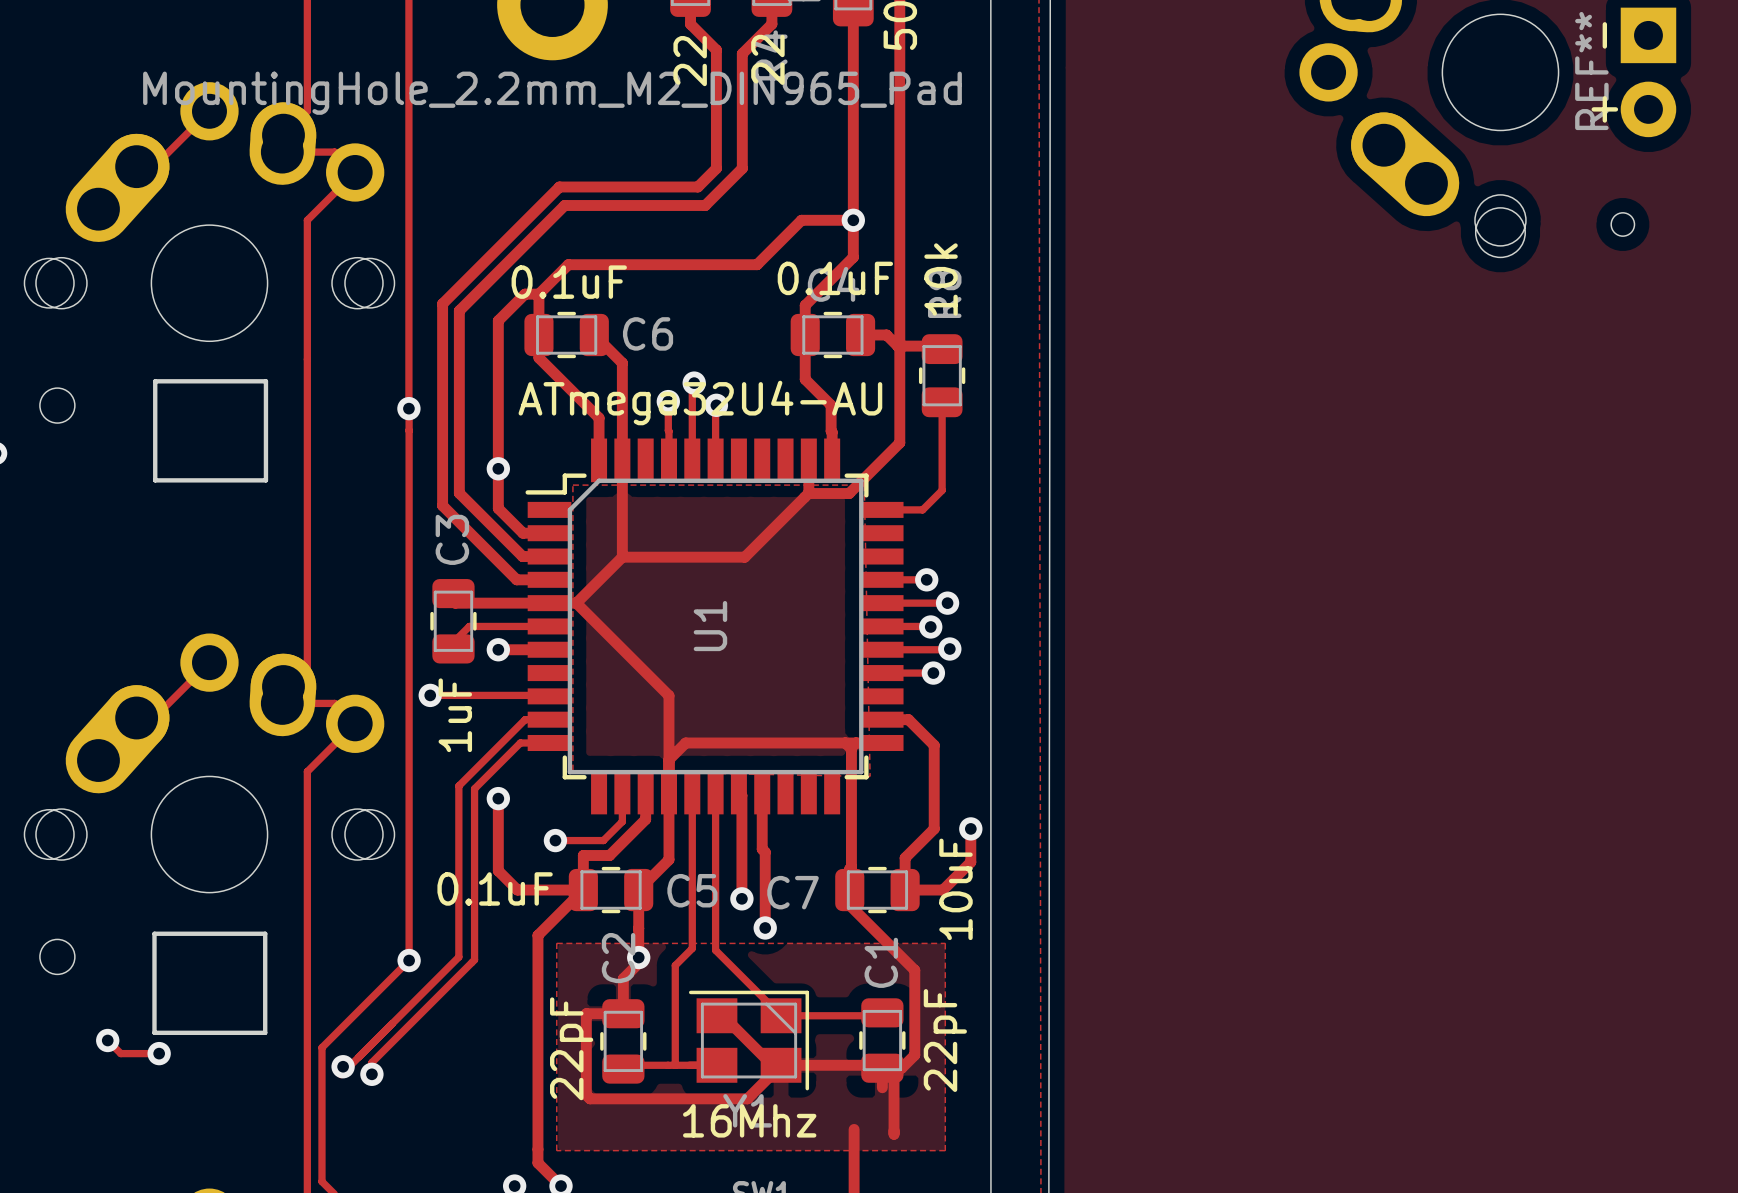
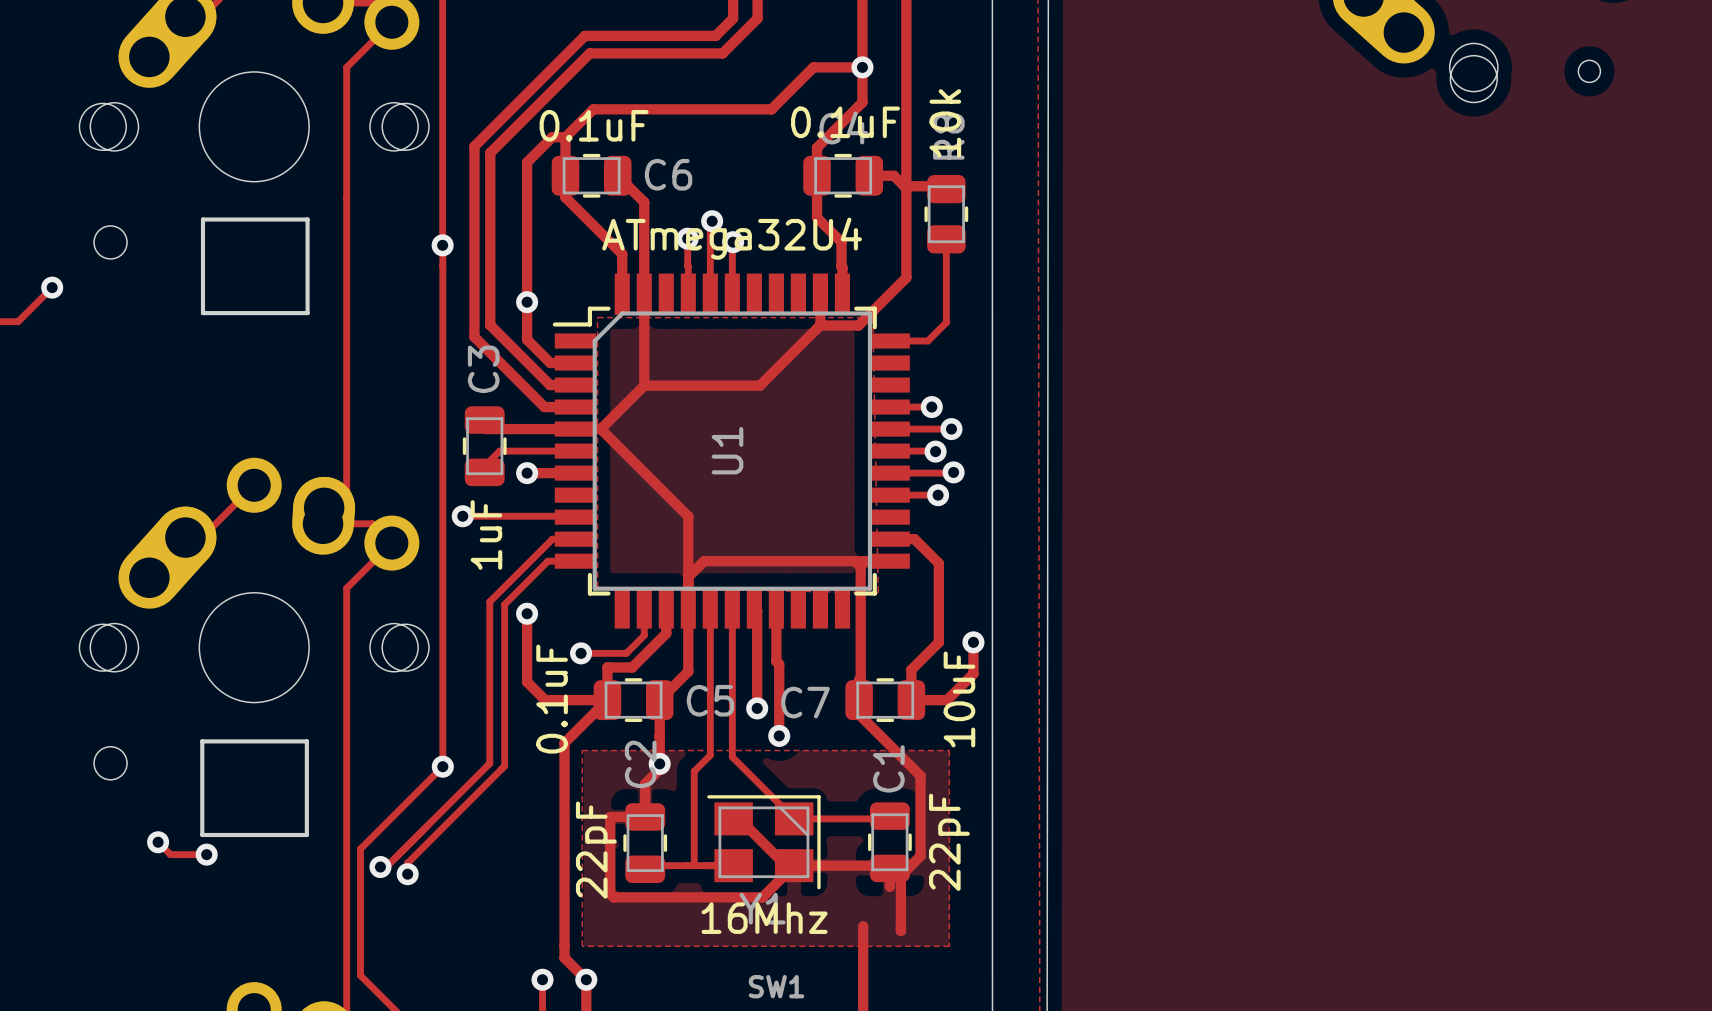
U1 value: ATmega32U4-AU (700, 402) -> ATmega32U4 (732, 238)
C5 value rotation: 0° (495, 888) -> 90° counterclockwise (552, 699)

